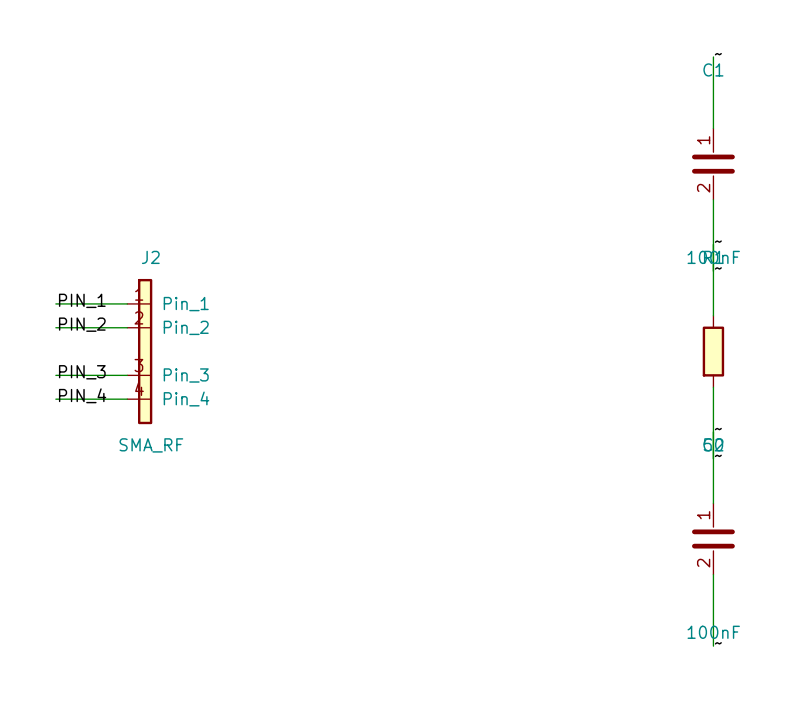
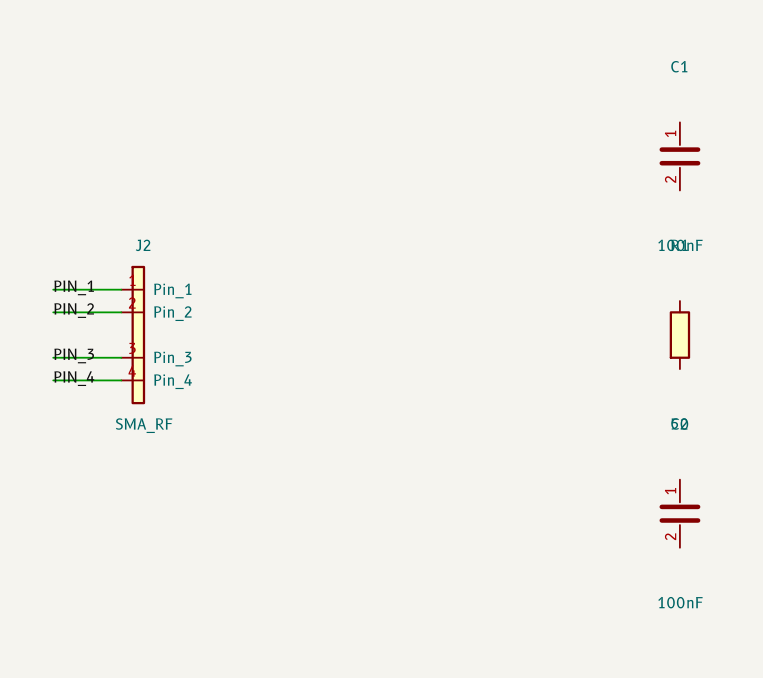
label: ~ (718, 54) -> none
wire: (713, 56) (713, 128) -> none
wire: (713, 199) (713, 315) -> none
label: ~ (718, 241) -> none
label: ~ (718, 268) -> none
wire: (713, 387) (713, 503) -> none
label: ~ (718, 429) -> none
label: ~ (718, 455) -> none
wire: (713, 574) (713, 646) -> none
label: ~ (718, 643) -> none

